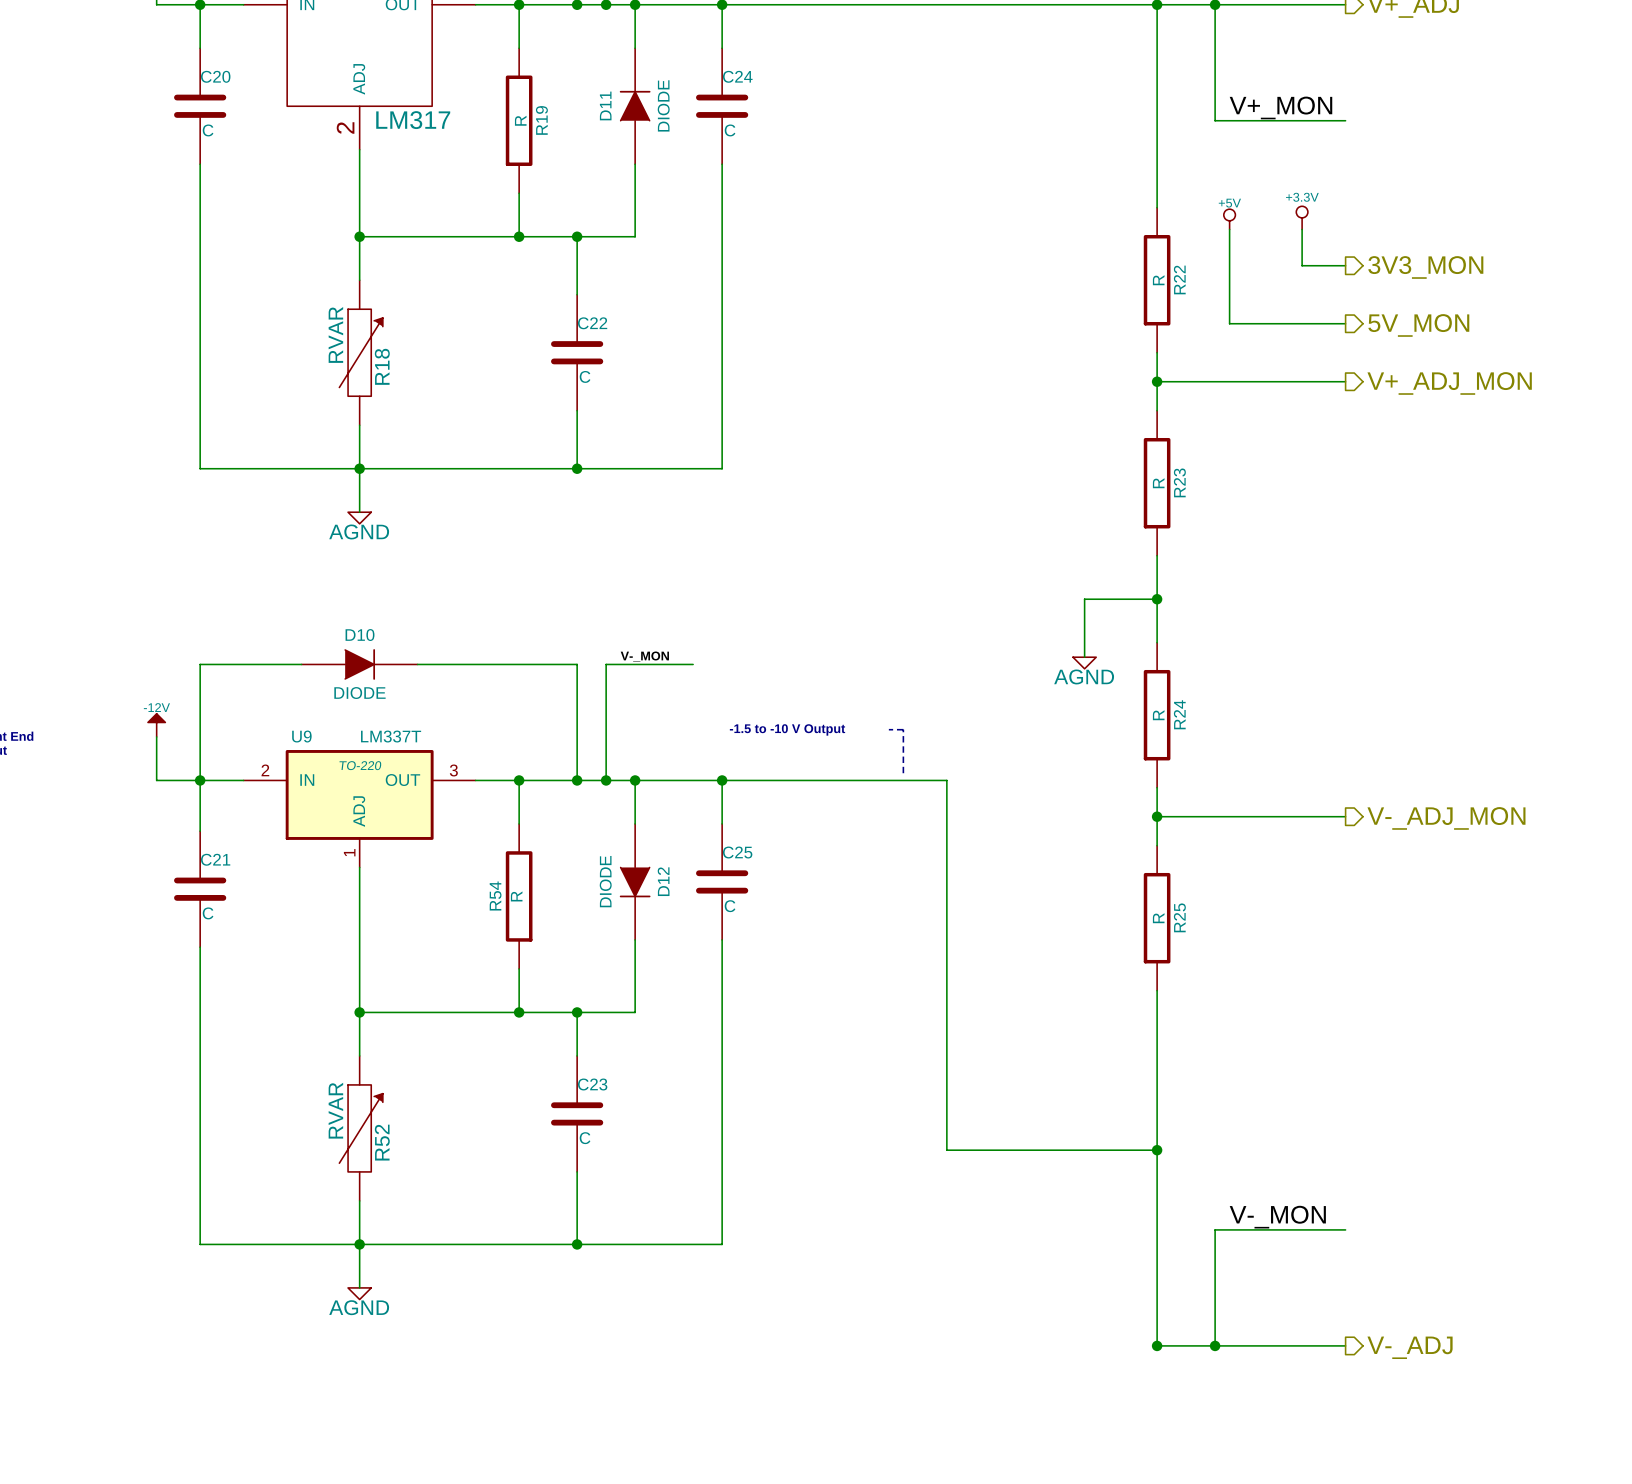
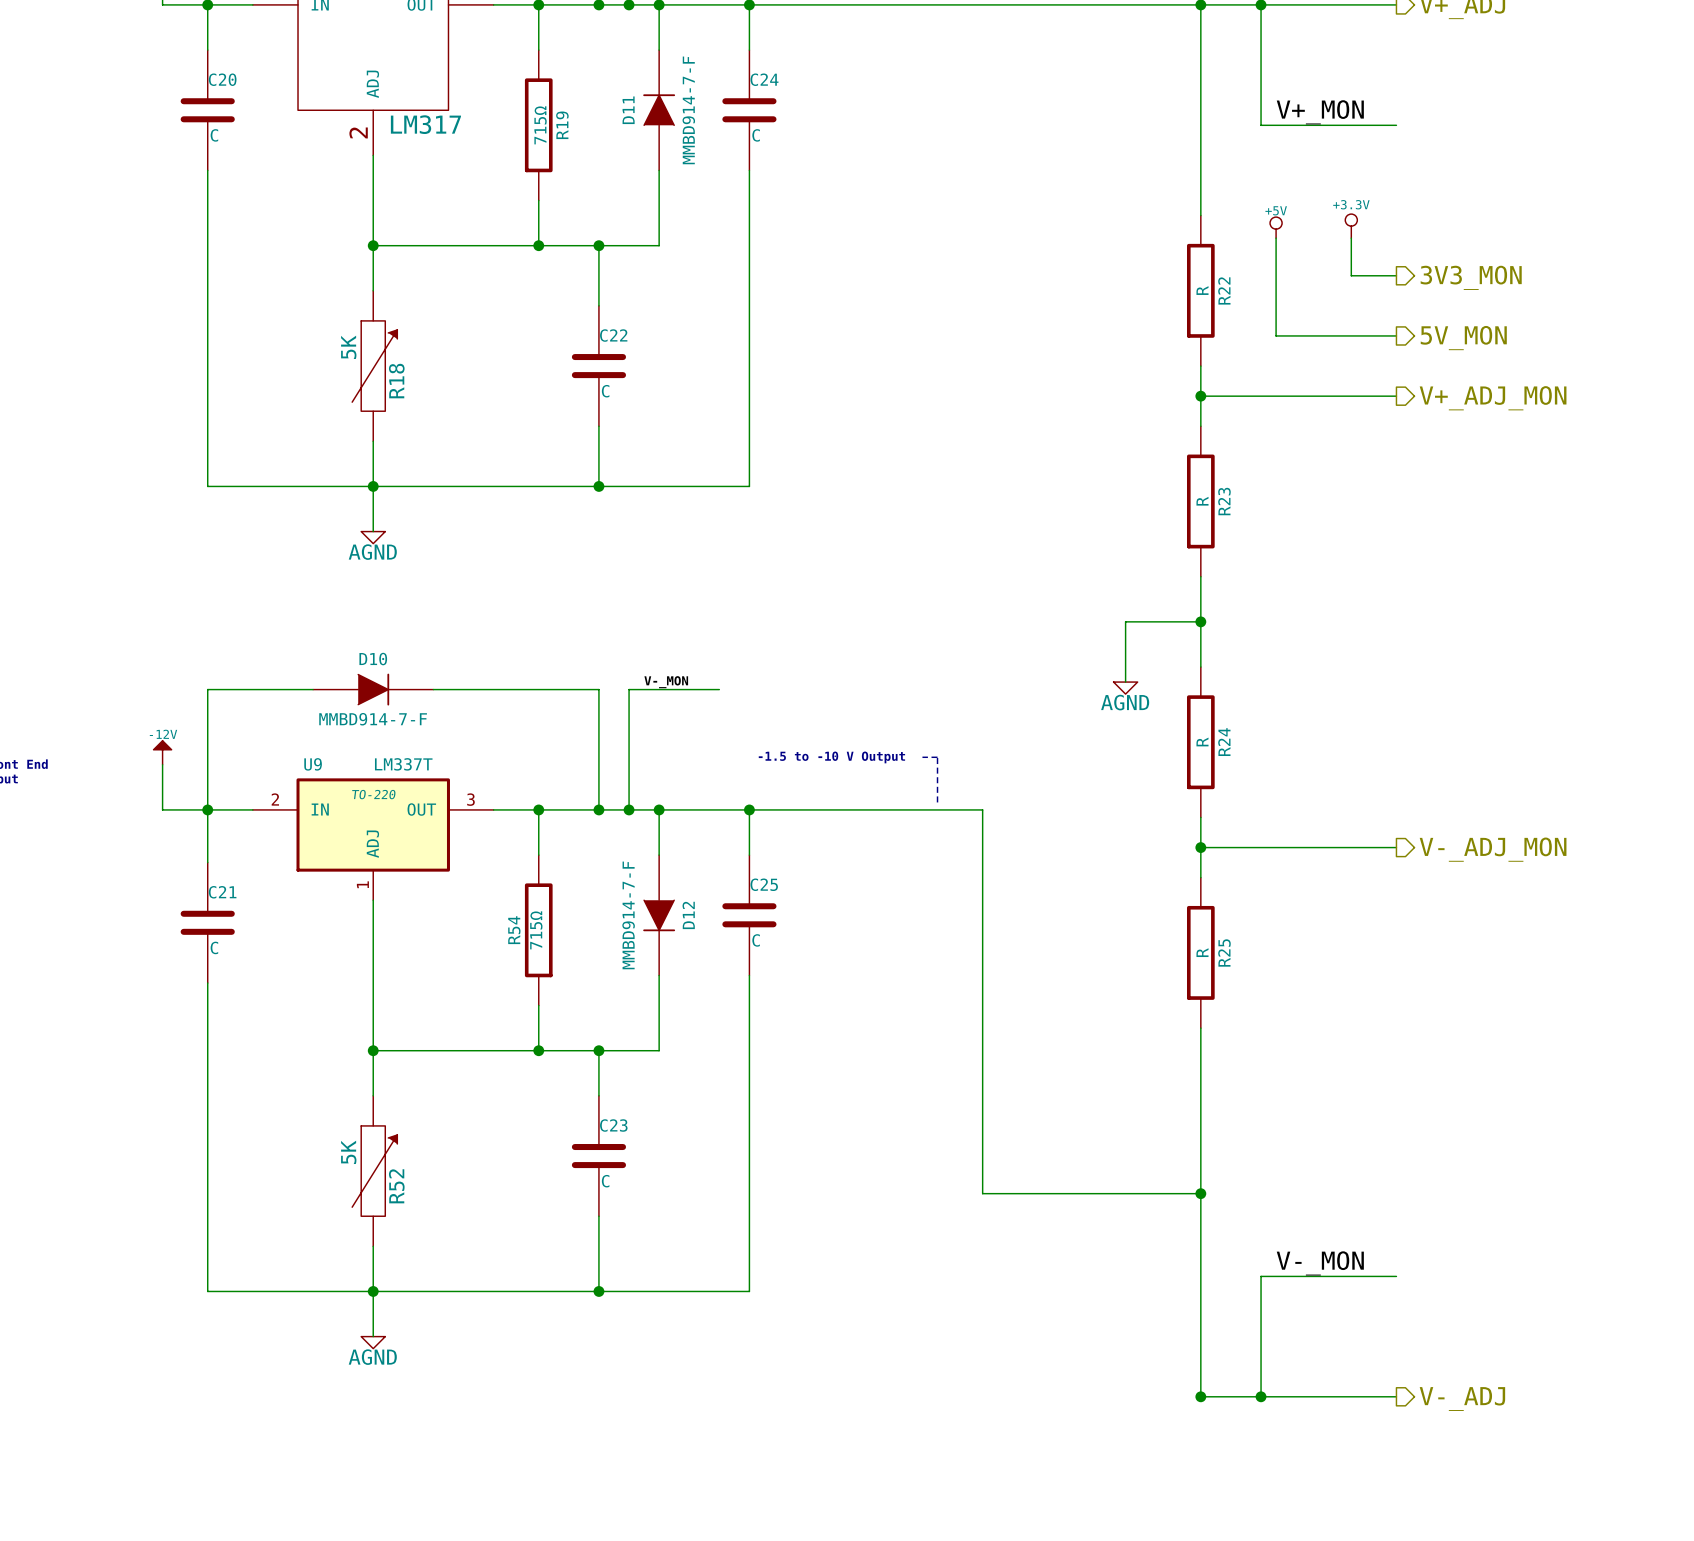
D11 value: DIODE (663, 105) -> MMBD914-7-F (688, 110)
R19 value: R (520, 120) -> 715Ω (540, 125)
R18 value: RVAR (335, 334) -> 5K (348, 347)
D10 value: DIODE (359, 693) -> MMBD914-7-F (373, 719)
D12 value: DIODE (605, 881) -> MMBD914-7-F (628, 915)
R54 value: R (516, 896) -> 715Ω (536, 930)
R52 value: RVAR (335, 1110) -> 5K (348, 1152)

